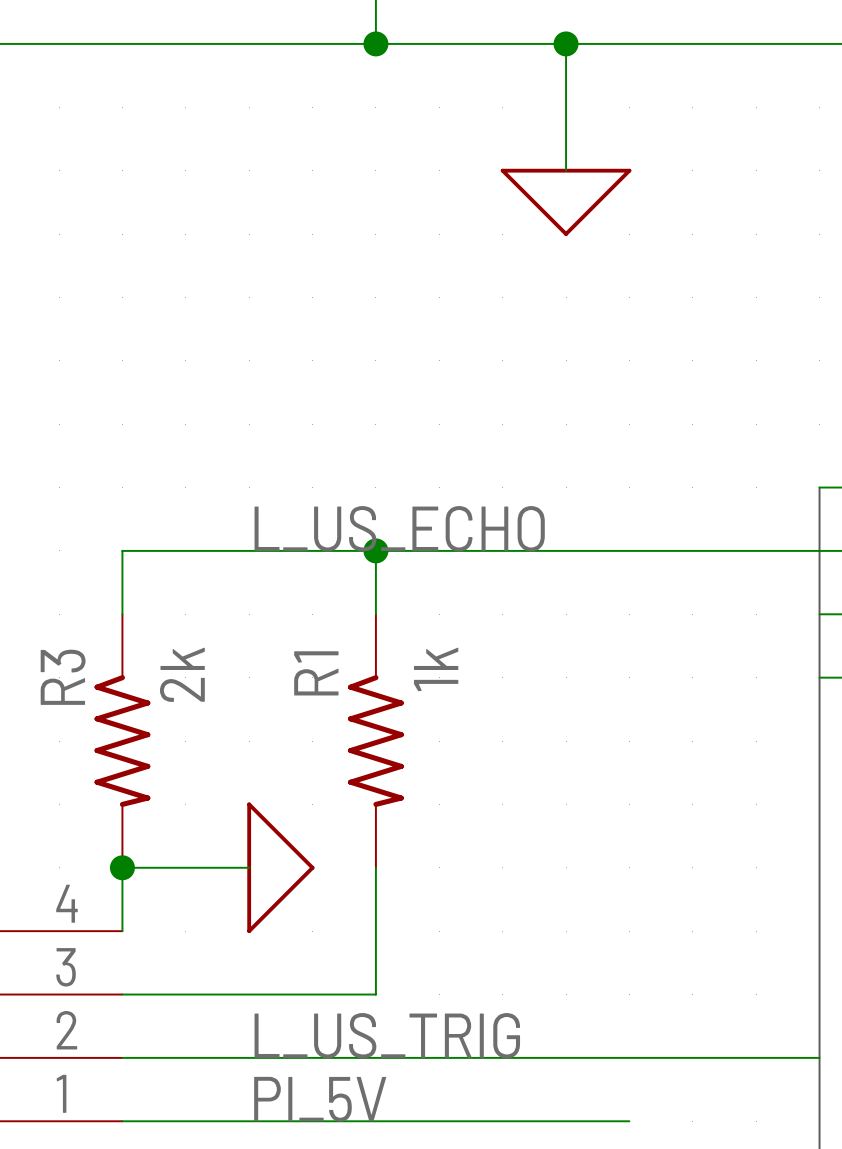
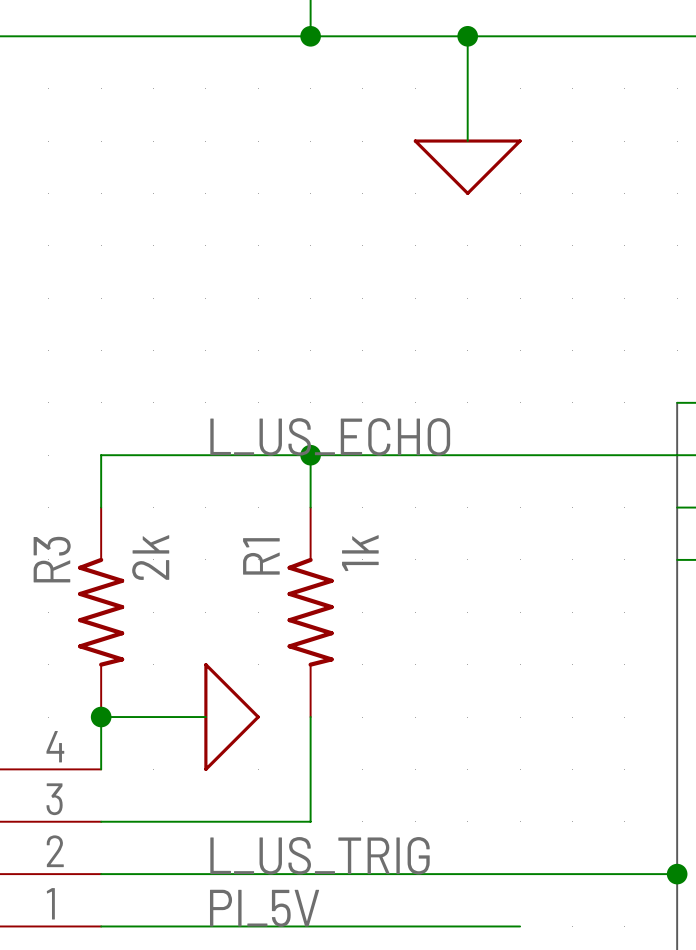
junction: none -> (677, 874)

